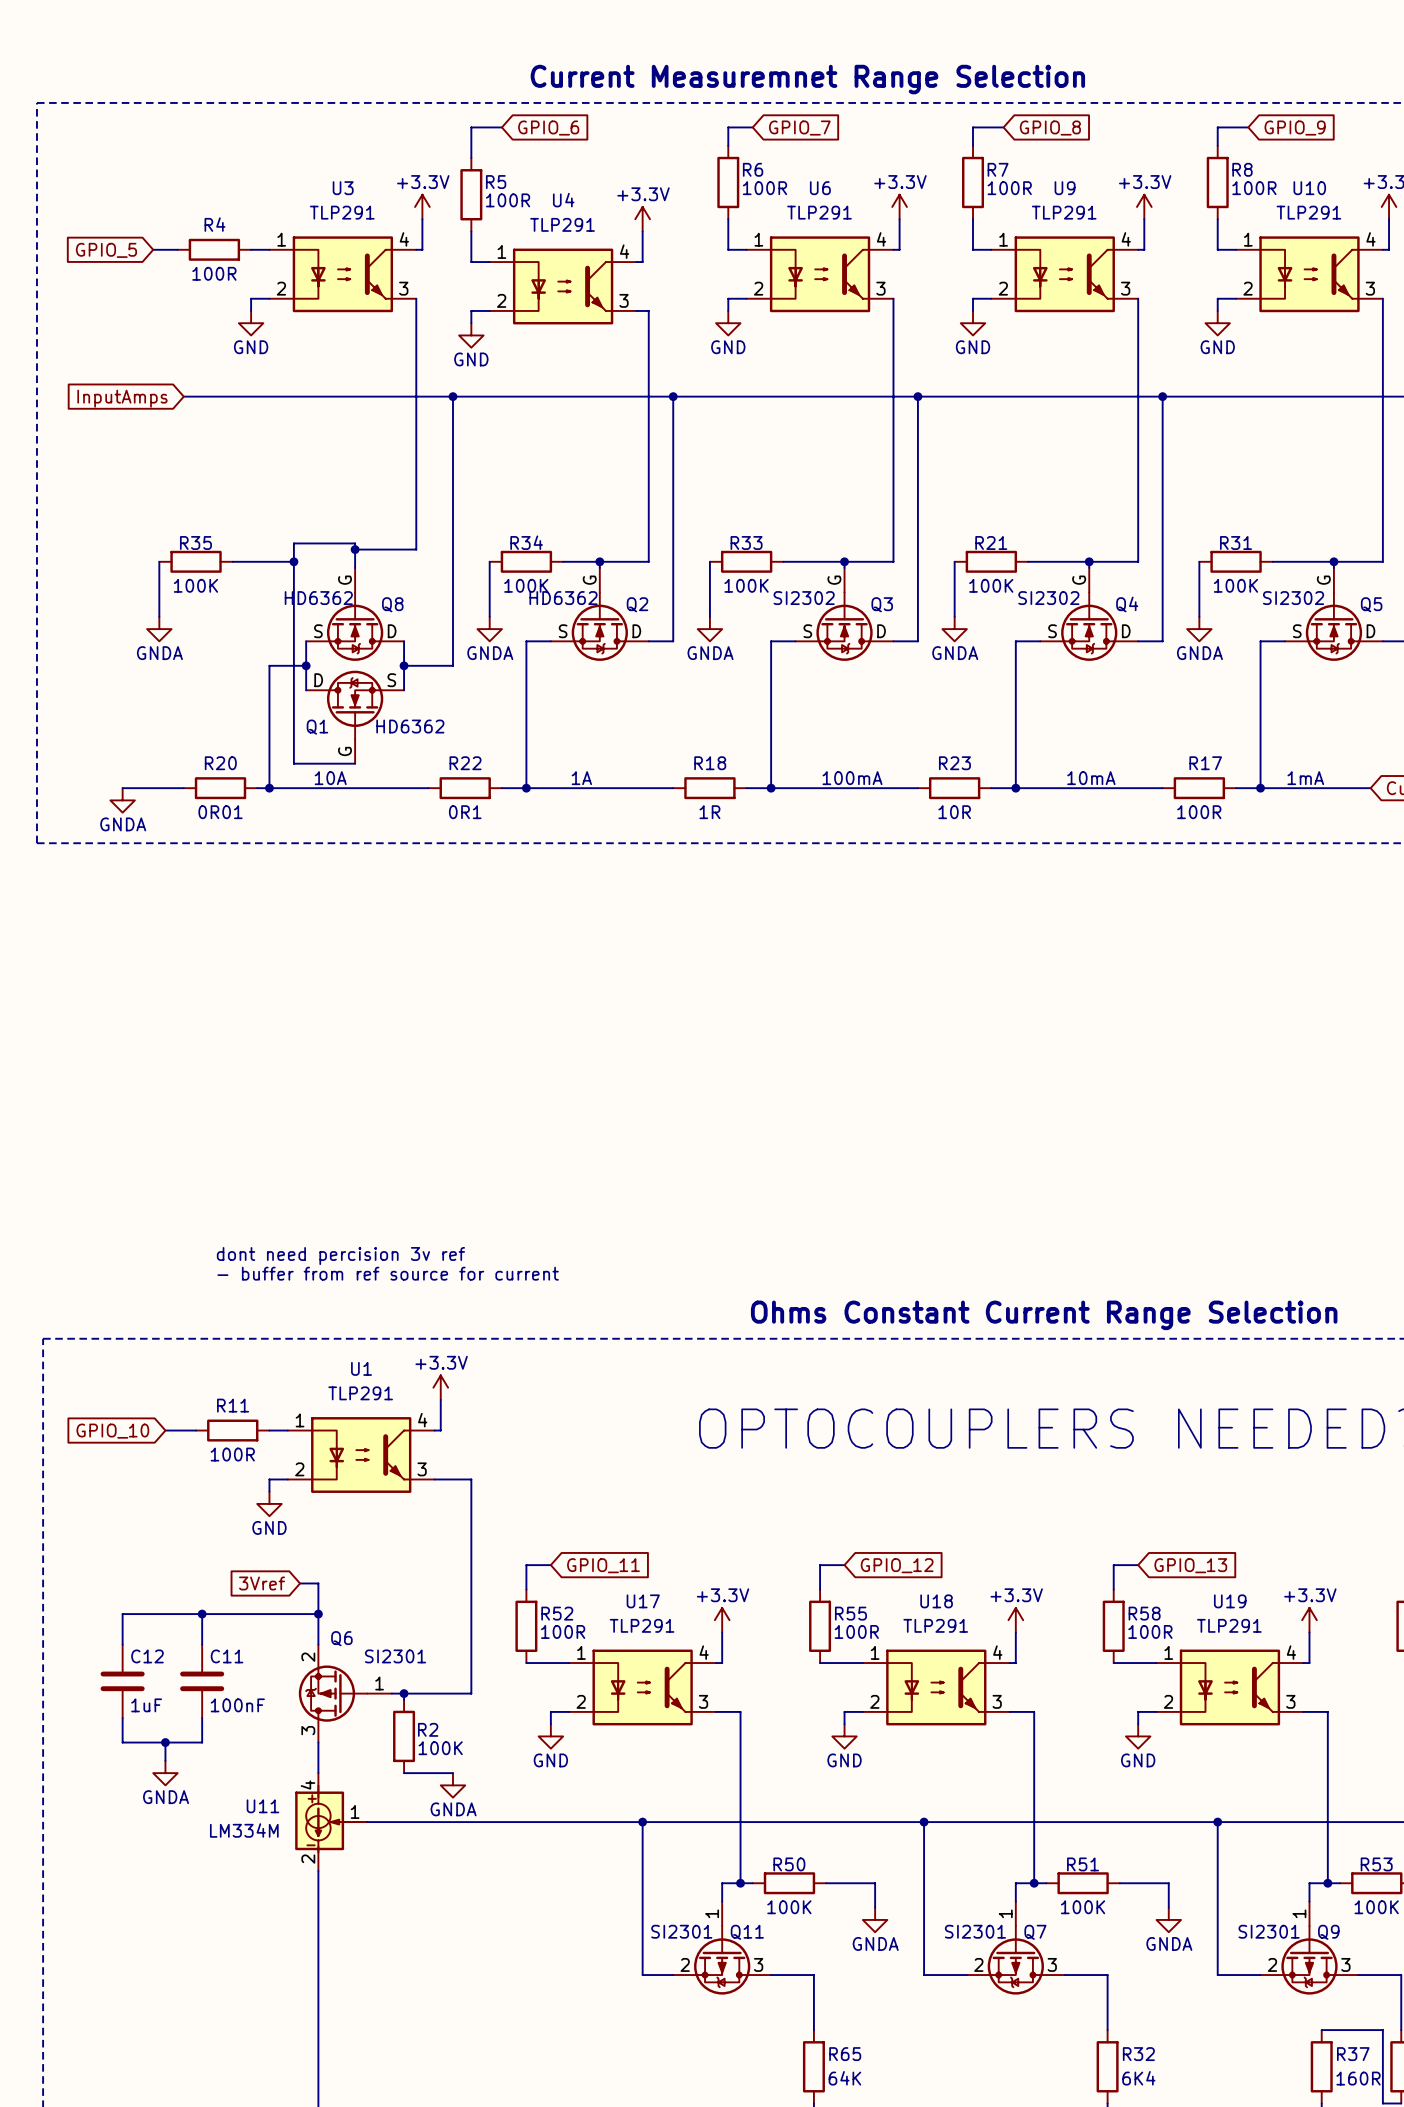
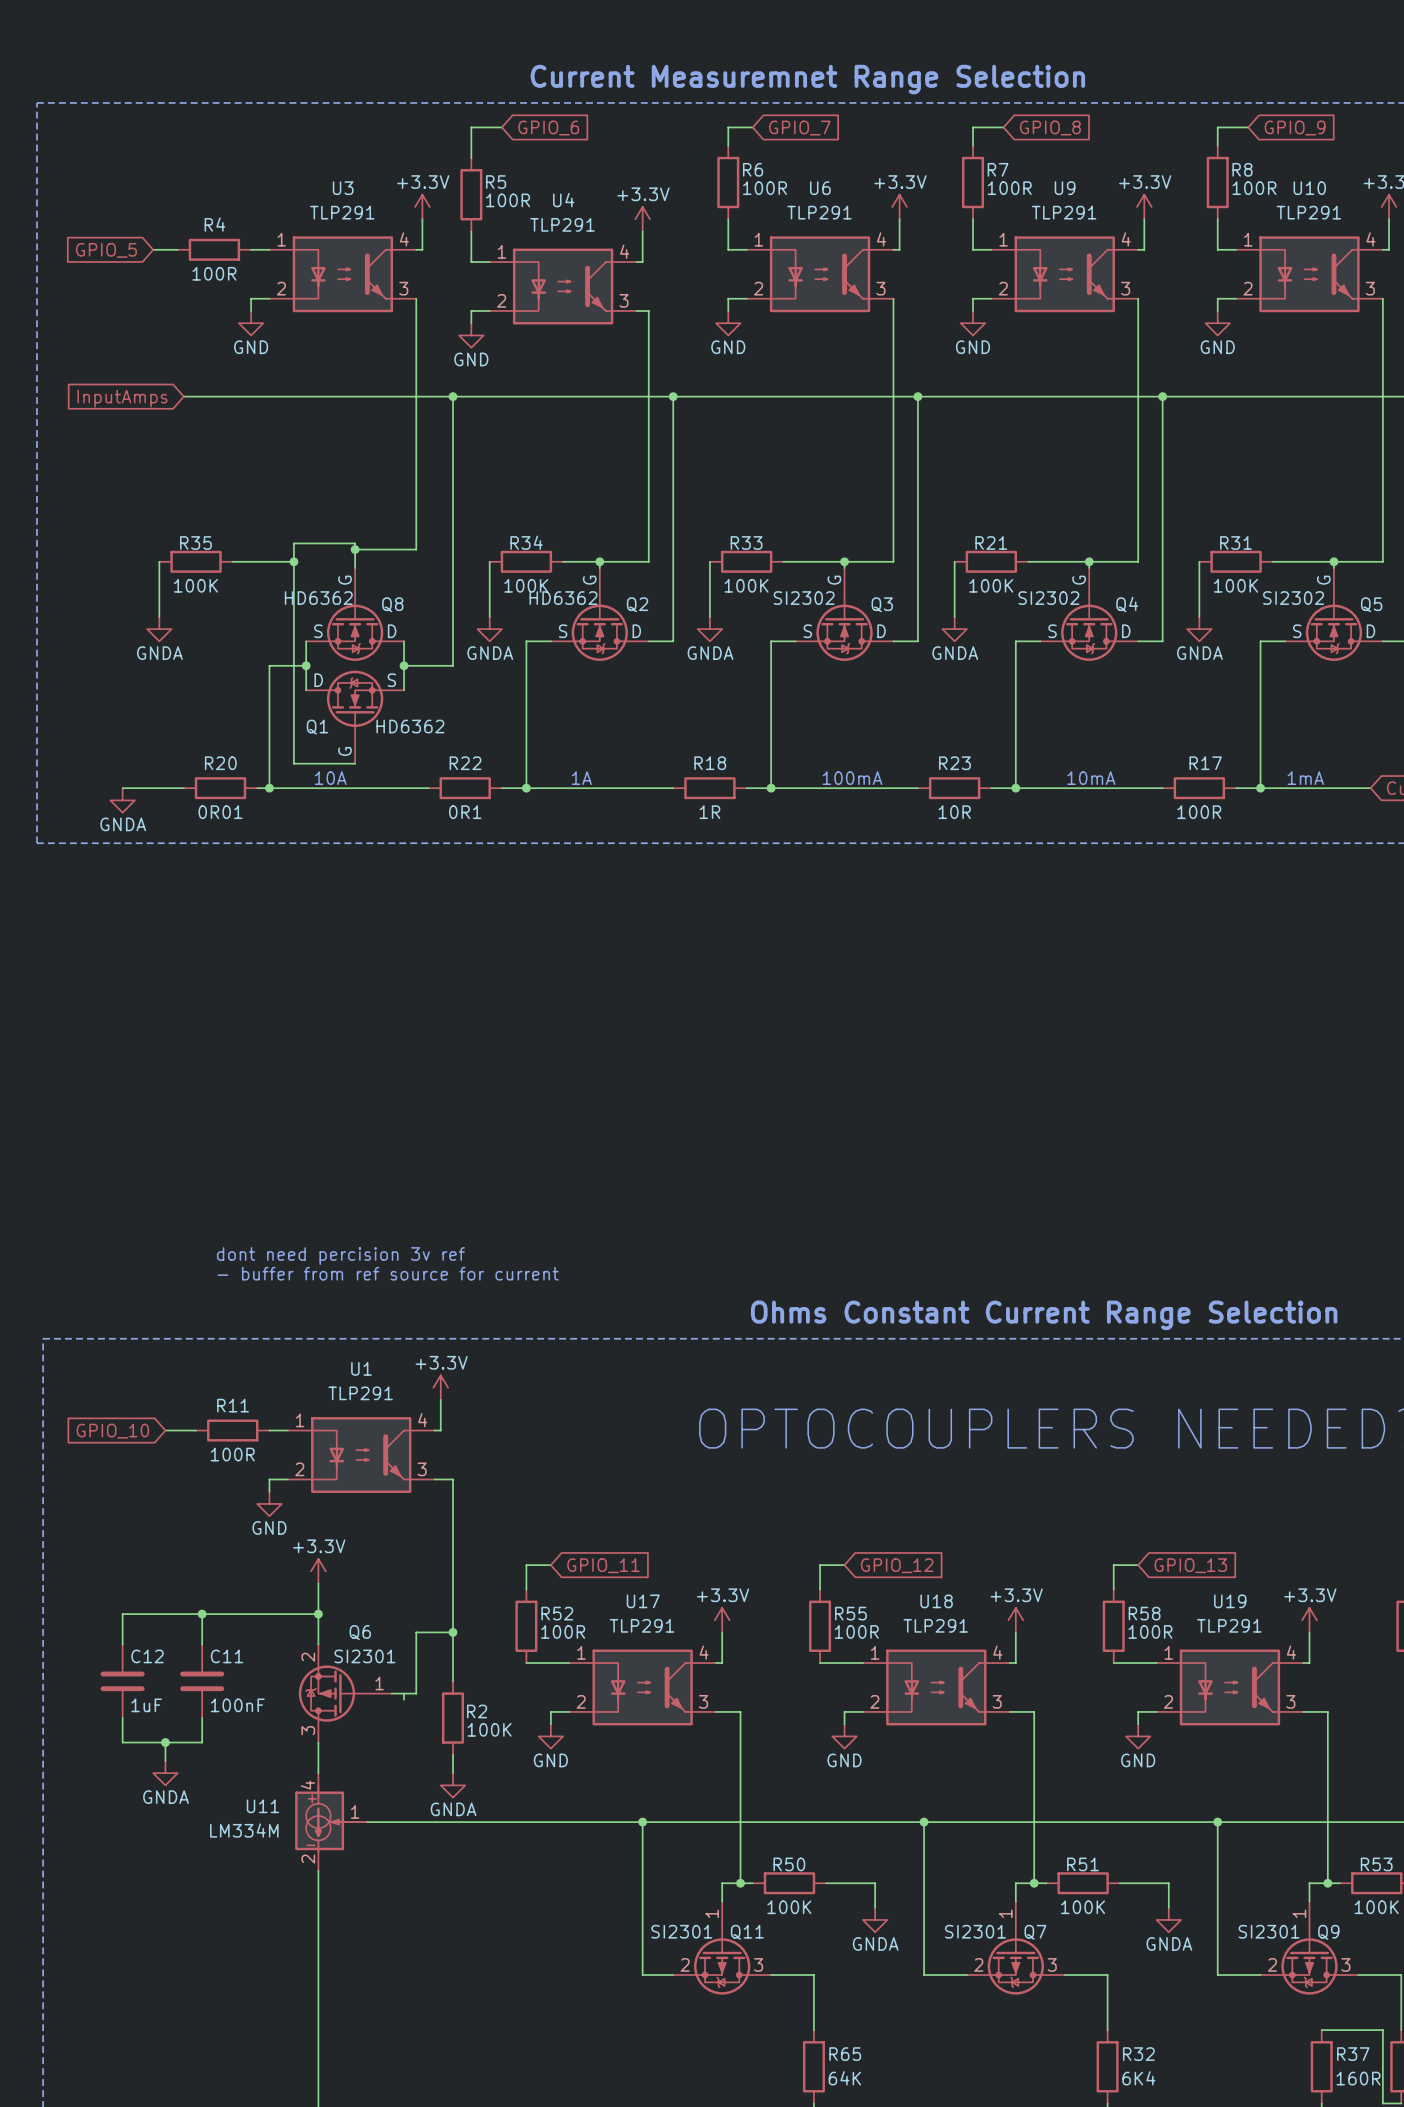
wire: (452, 1479) (471, 1479) (471, 1693) (416, 1693) -> (452, 1479) (452, 1681)
power symbol: none -> +3.3V (318, 1571)
global label: 3Vref (262, 1583) -> none
wire: (300, 1583) (318, 1583) -> none
wire: none -> (452, 1632) (416, 1632) (416, 1693)
junction: none -> (452, 1632)
Q6 name position: Q6 (341, 1638) -> Q6 (360, 1632)
Q6 value position: SI2301 (395, 1656) -> SI2301 (364, 1656)
junction: (404, 1693) -> none
R2 position: (404, 1736) -> (452, 1718)
wire: (404, 1773) (452, 1773) -> (452, 1754) (452, 1773)

